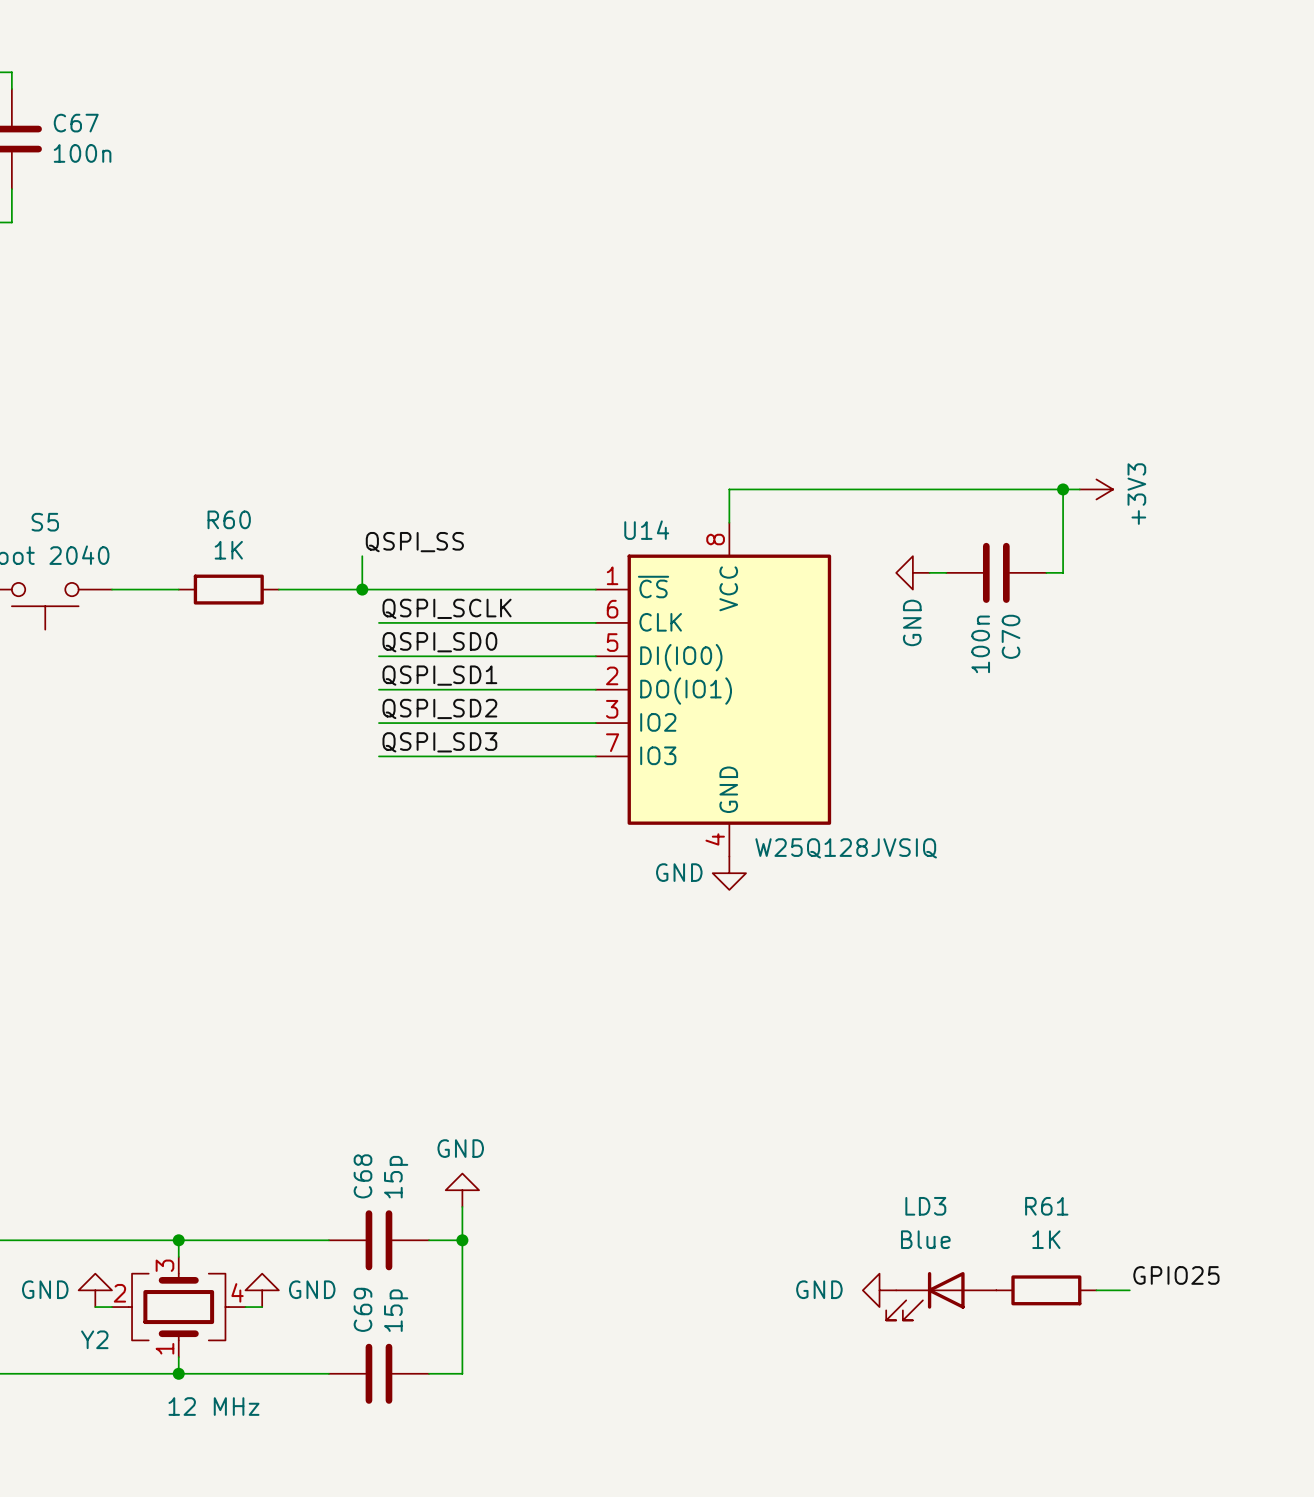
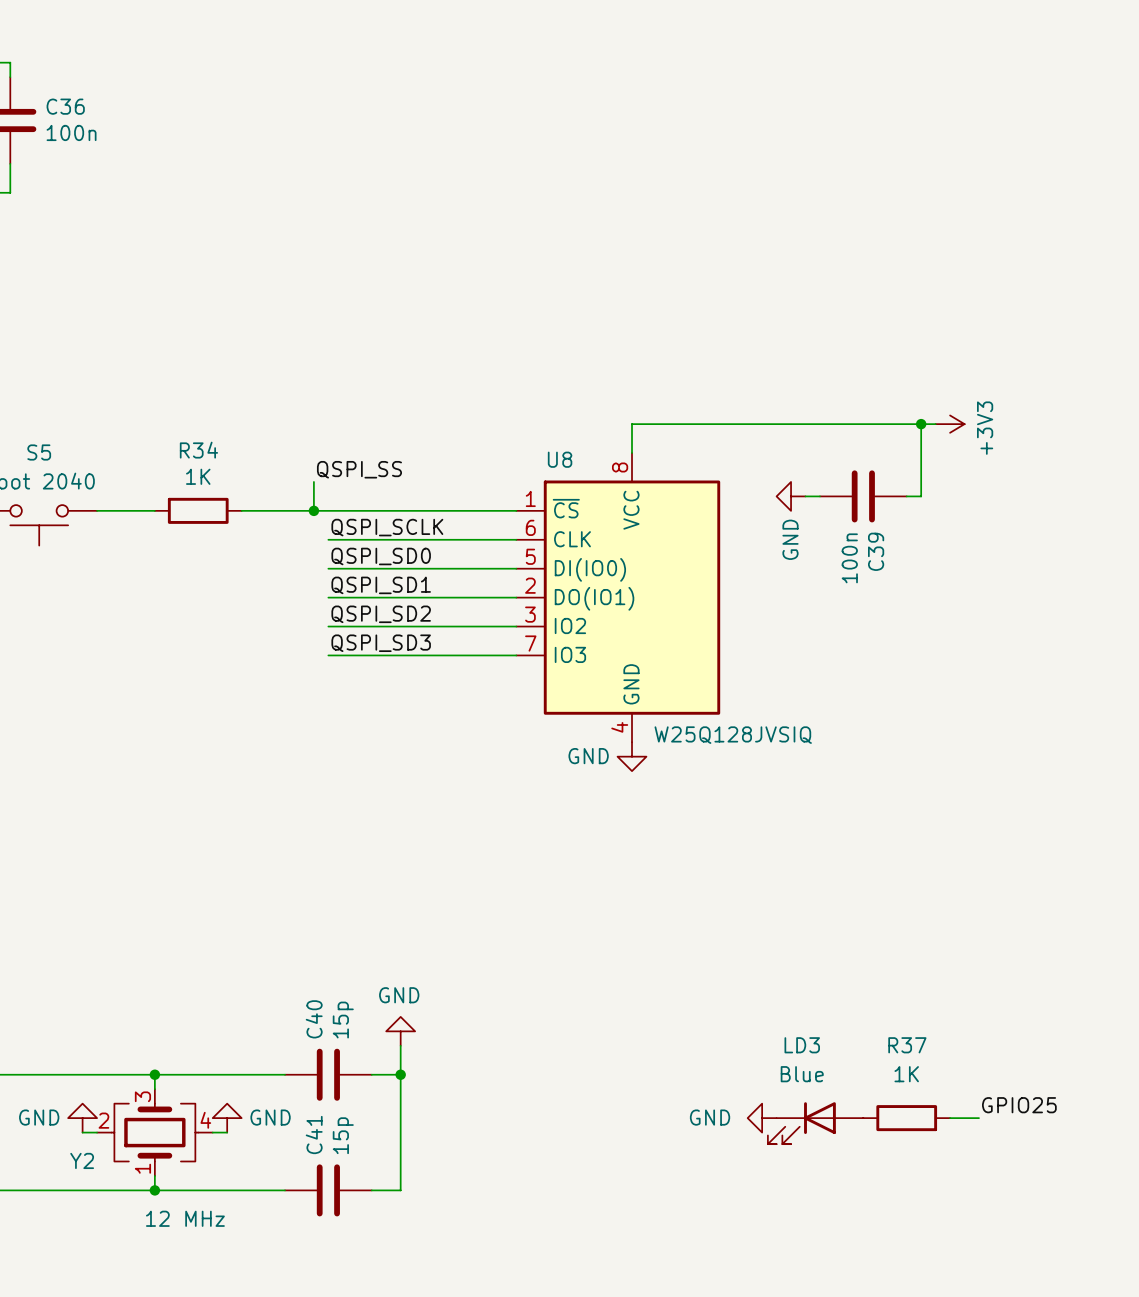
C67 name: C67 (76, 123) -> C36 (65, 106)
R60 name: R60 (229, 519) -> R34 (198, 450)
U14 name: U14 (646, 530) -> U8 (560, 459)
C70 name: C70 (1011, 636) -> C39 (876, 551)
C68 name: C68 (362, 1176) -> C40 (314, 1019)
R61 name: R61 (1046, 1206) -> R37 (907, 1045)
C69 name: C69 (362, 1309) -> C41 (314, 1135)

